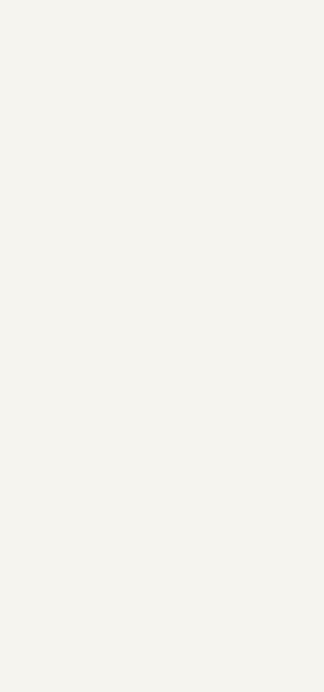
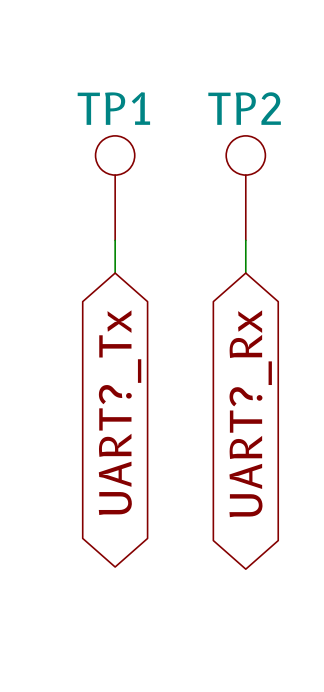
TP1: none -> (115, 188)
TP2: none -> (245, 188)
wire: none -> (115, 240) (115, 273)
wire: none -> (245, 240) (245, 273)
global label: none -> UART?_Tx (120, 412)
global label: none -> UART?_Rx (250, 413)

